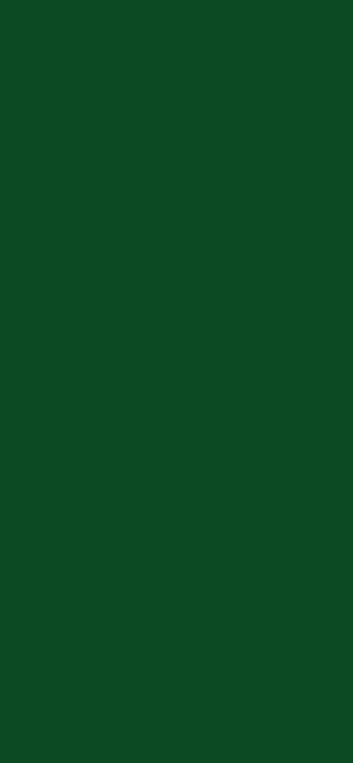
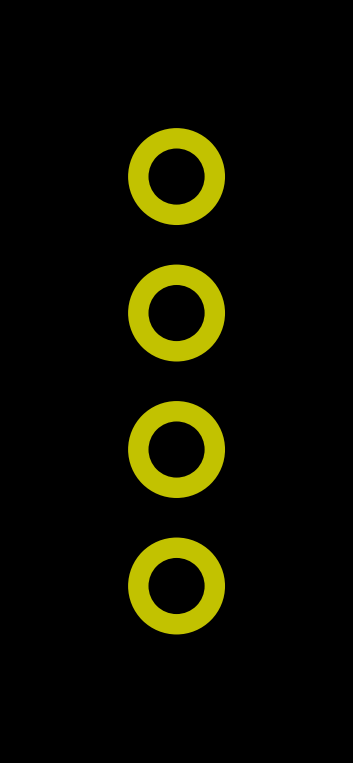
part: none -> (176, 176)
part: none -> (176, 313)
part: none -> (176, 449)
part: none -> (176, 586)

